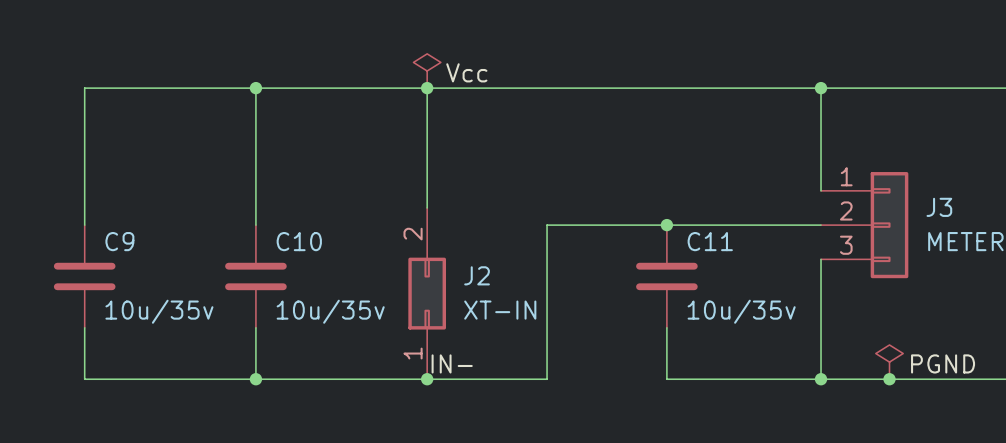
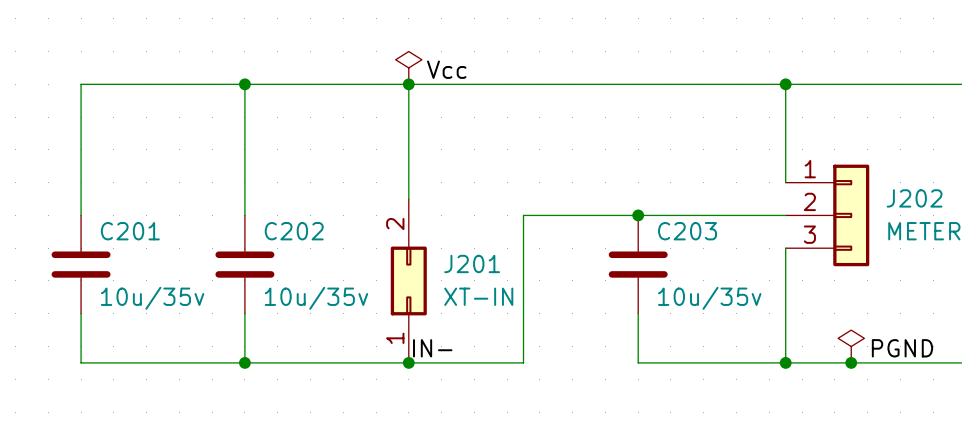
J3 name: J3 (939, 207) -> J202 (914, 198)
C9 name: C9 (119, 241) -> C201 (130, 231)
C10 name: C10 (299, 241) -> C202 (294, 231)
C11 name: C11 (710, 241) -> C203 (687, 231)
J2 name: J2 (477, 275) -> J201 (472, 263)

